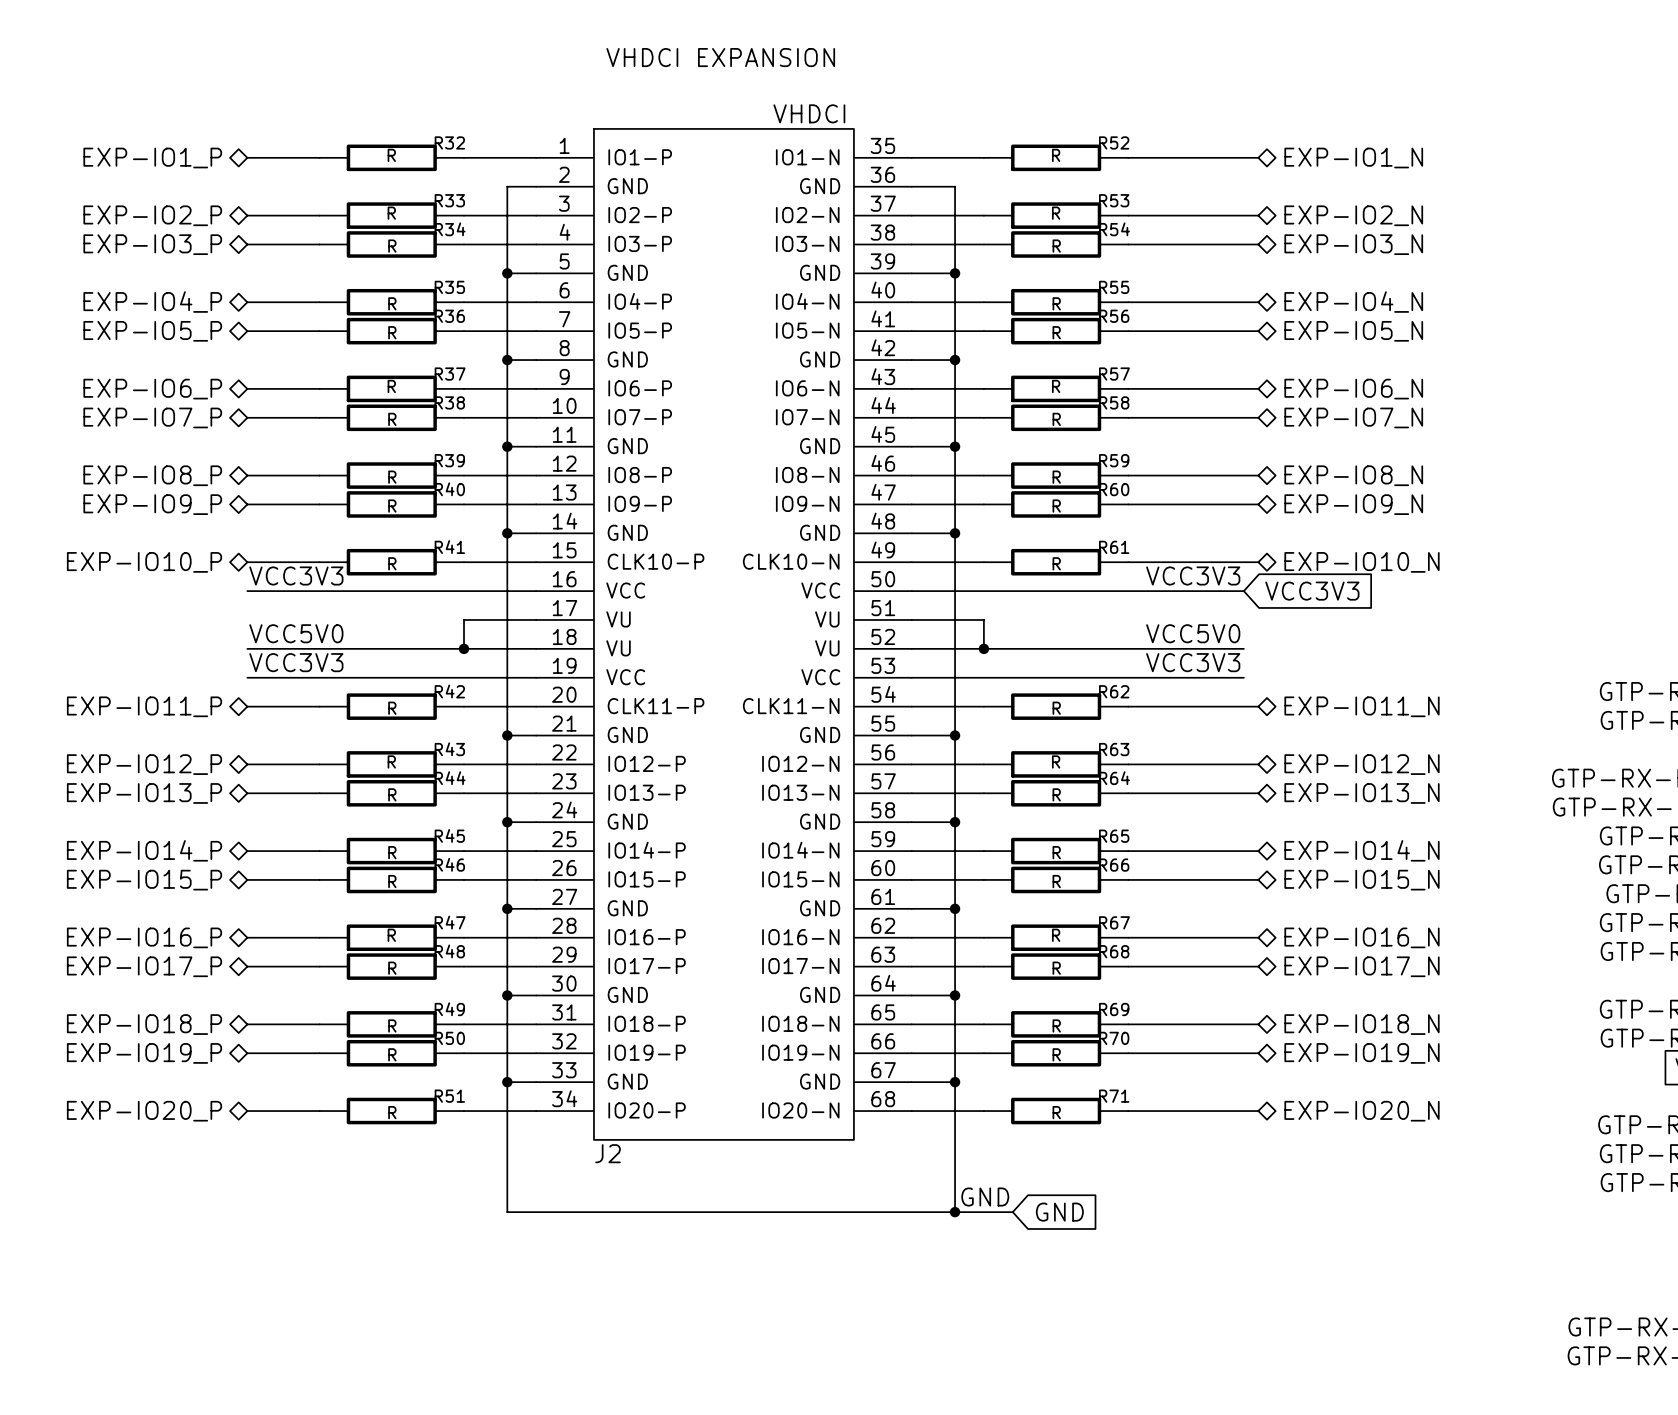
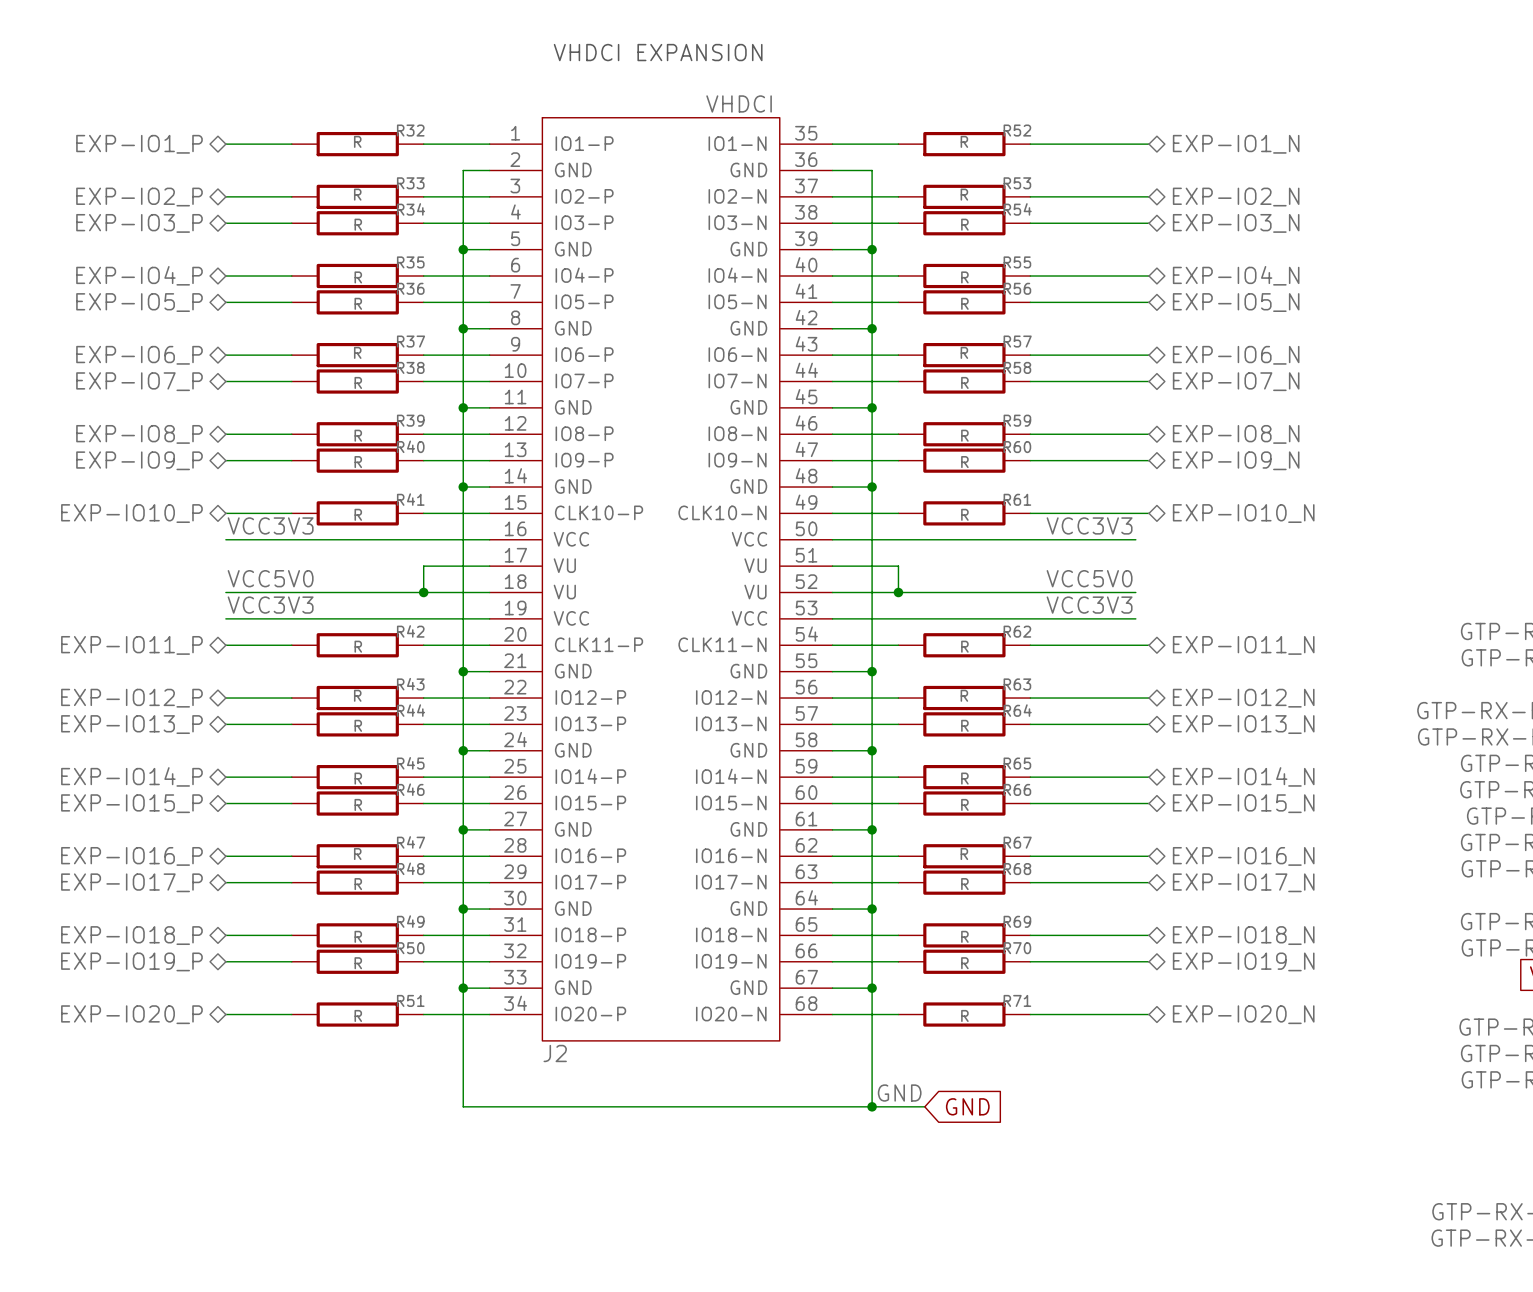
global label: VCC3V3 (1312, 591) -> none

